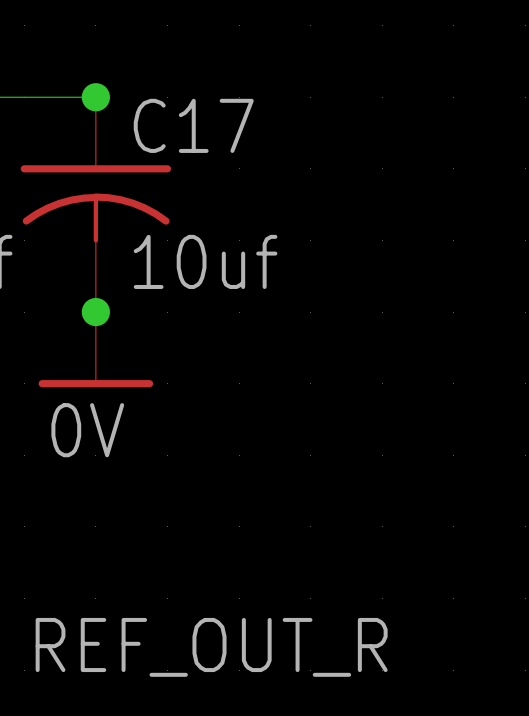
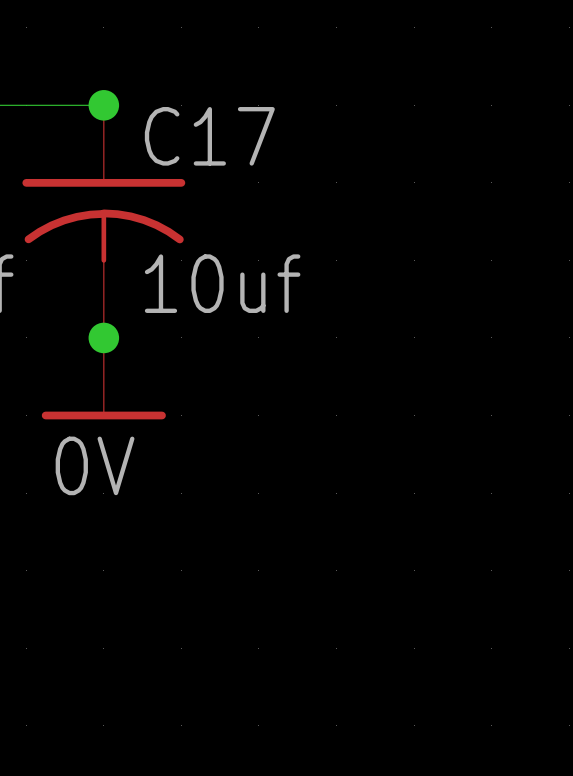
label: REF_OUT_R (211, 647) -> none

